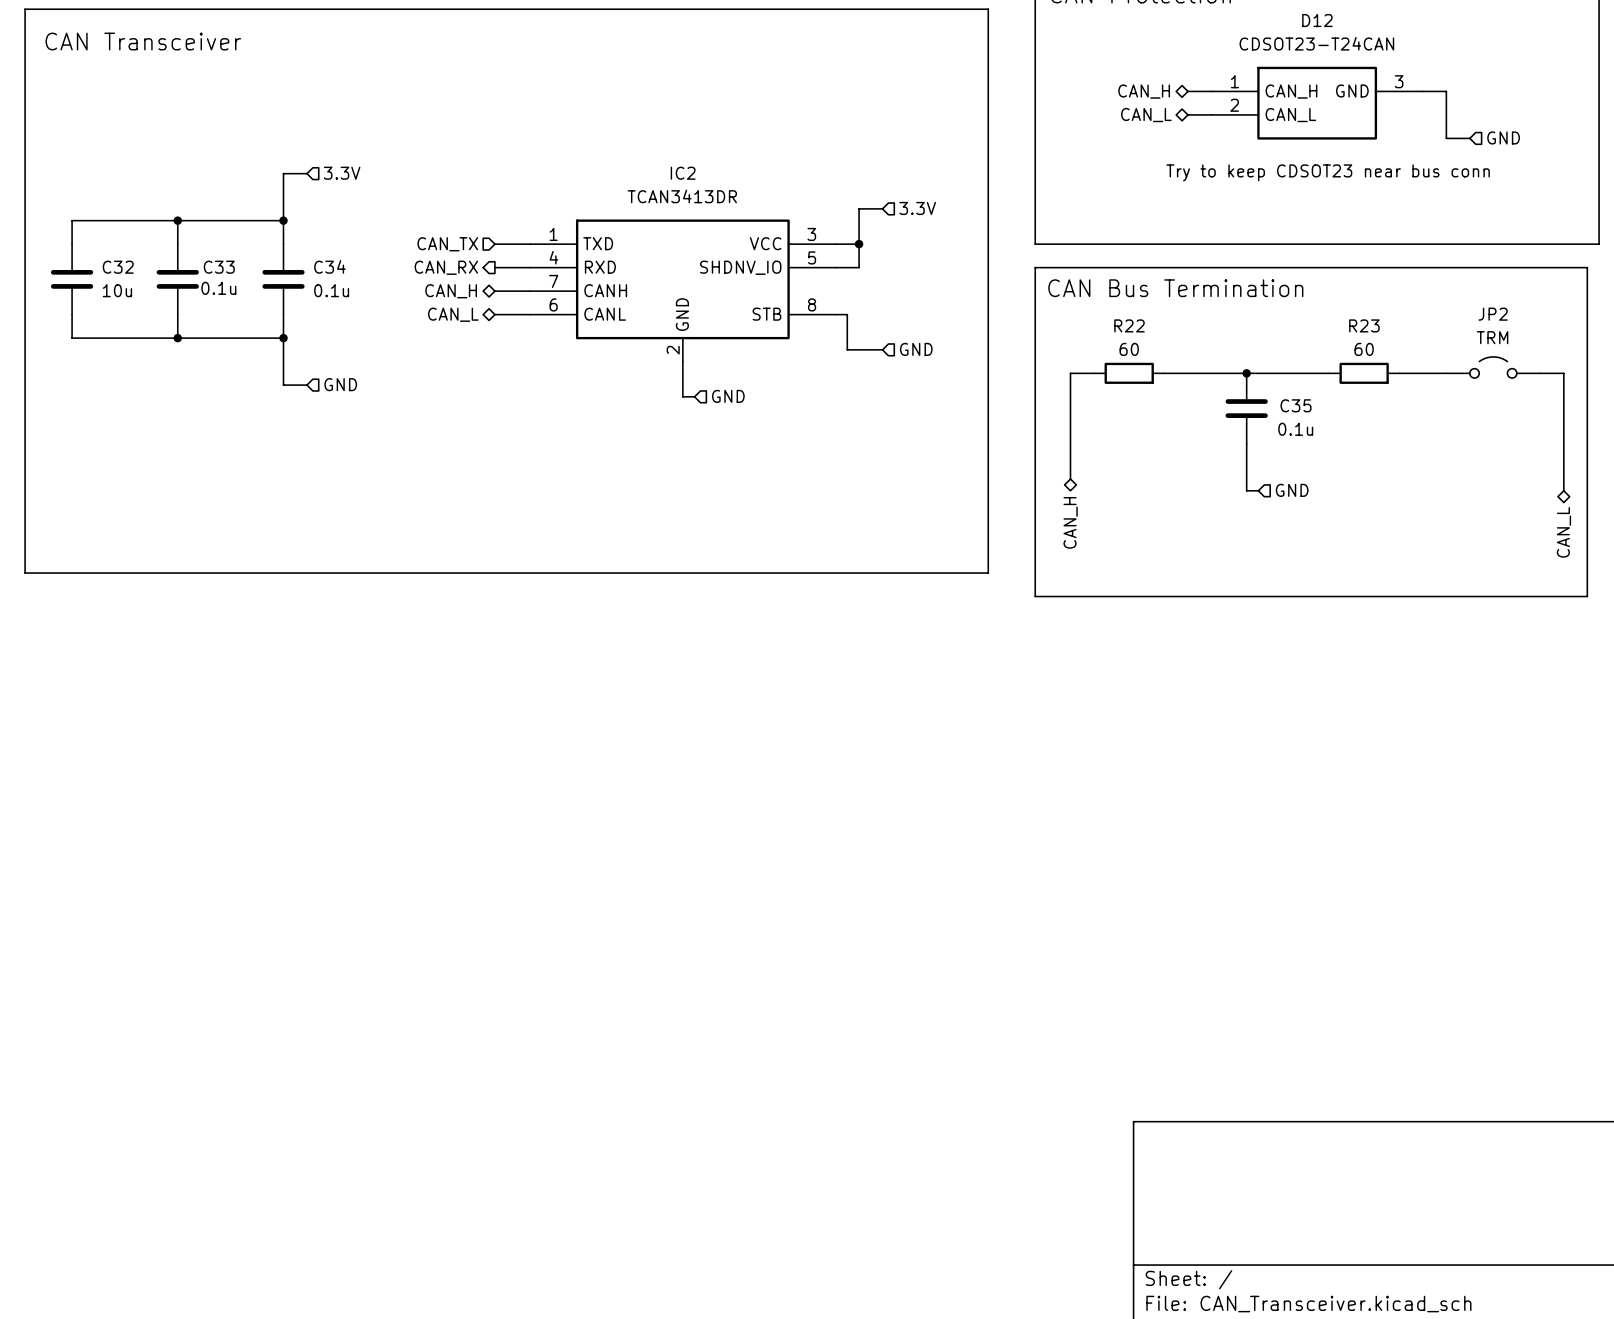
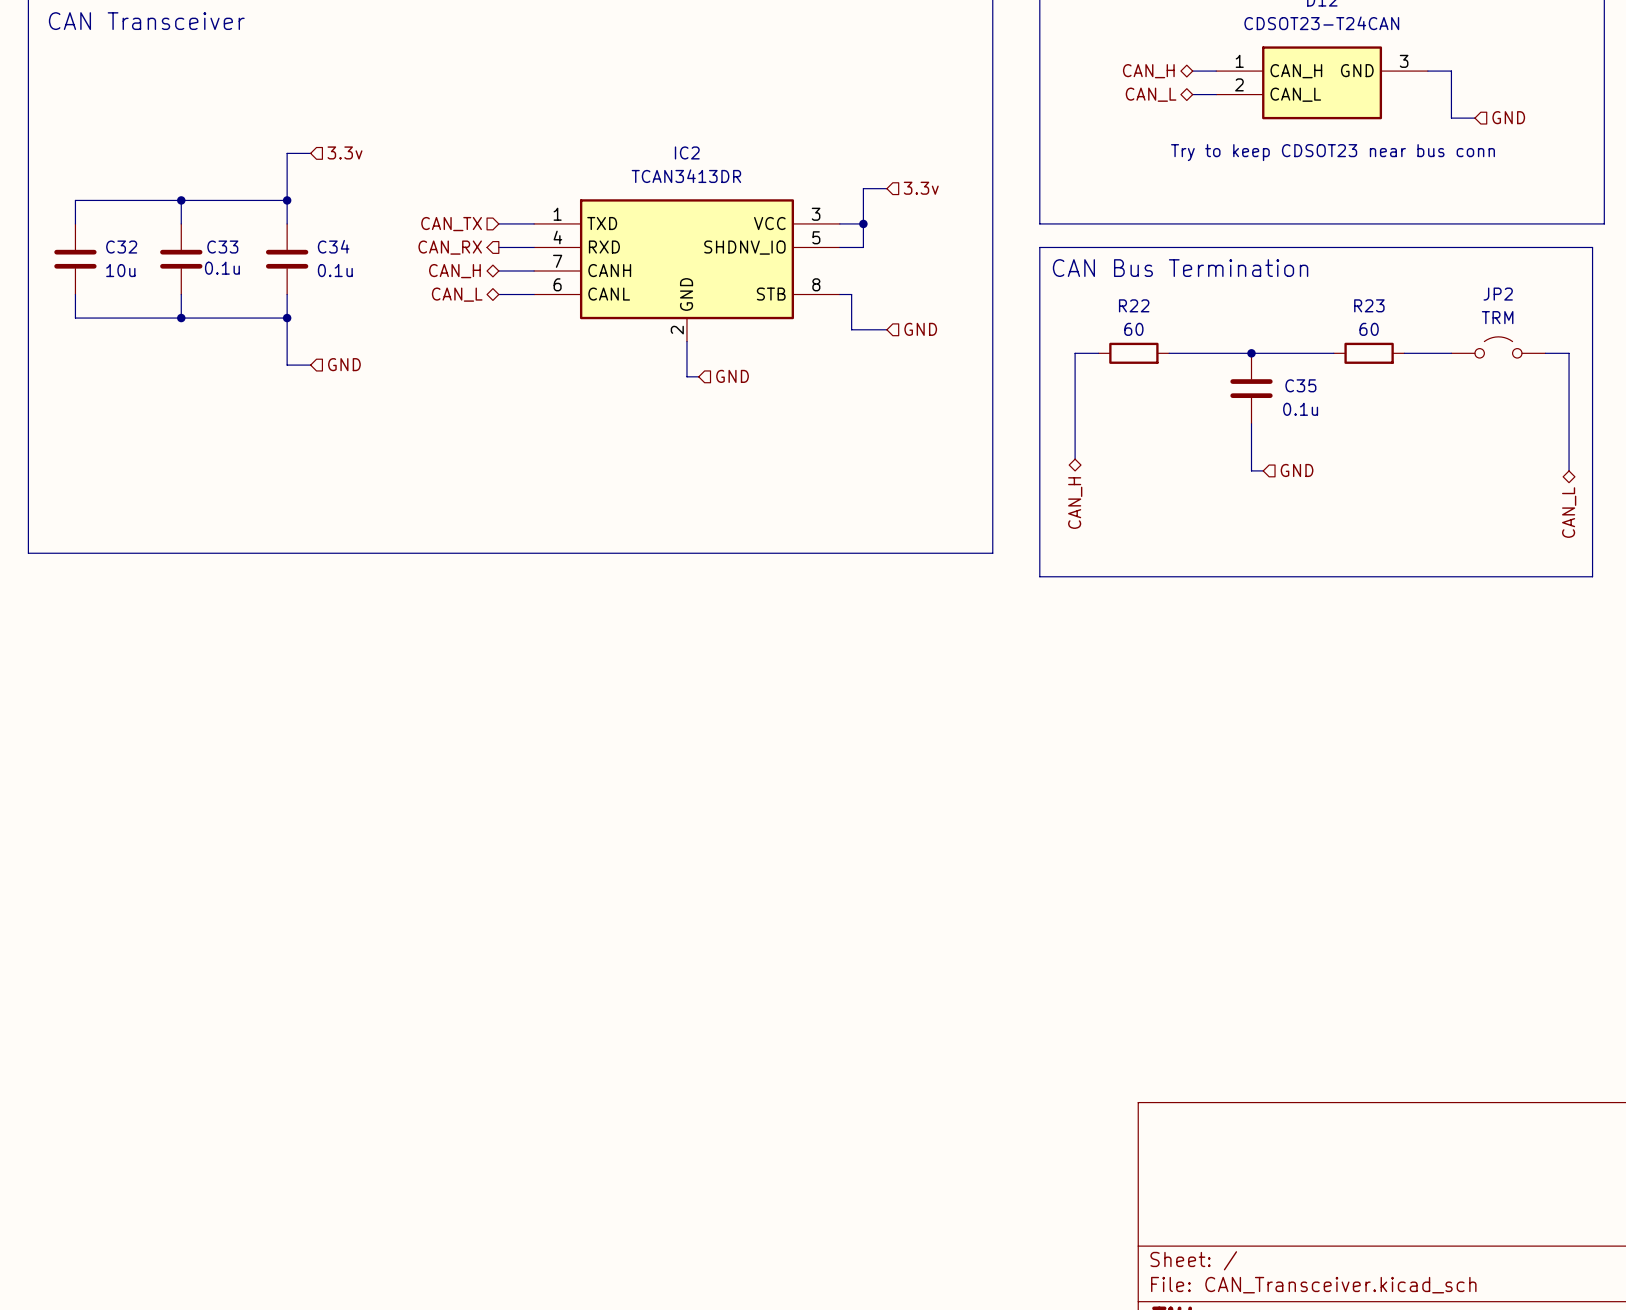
hierarchical label: 3.3V (342, 173) -> 3.3v (344, 152)
hierarchical label: 3.3V (917, 208) -> 3.3v (921, 188)

